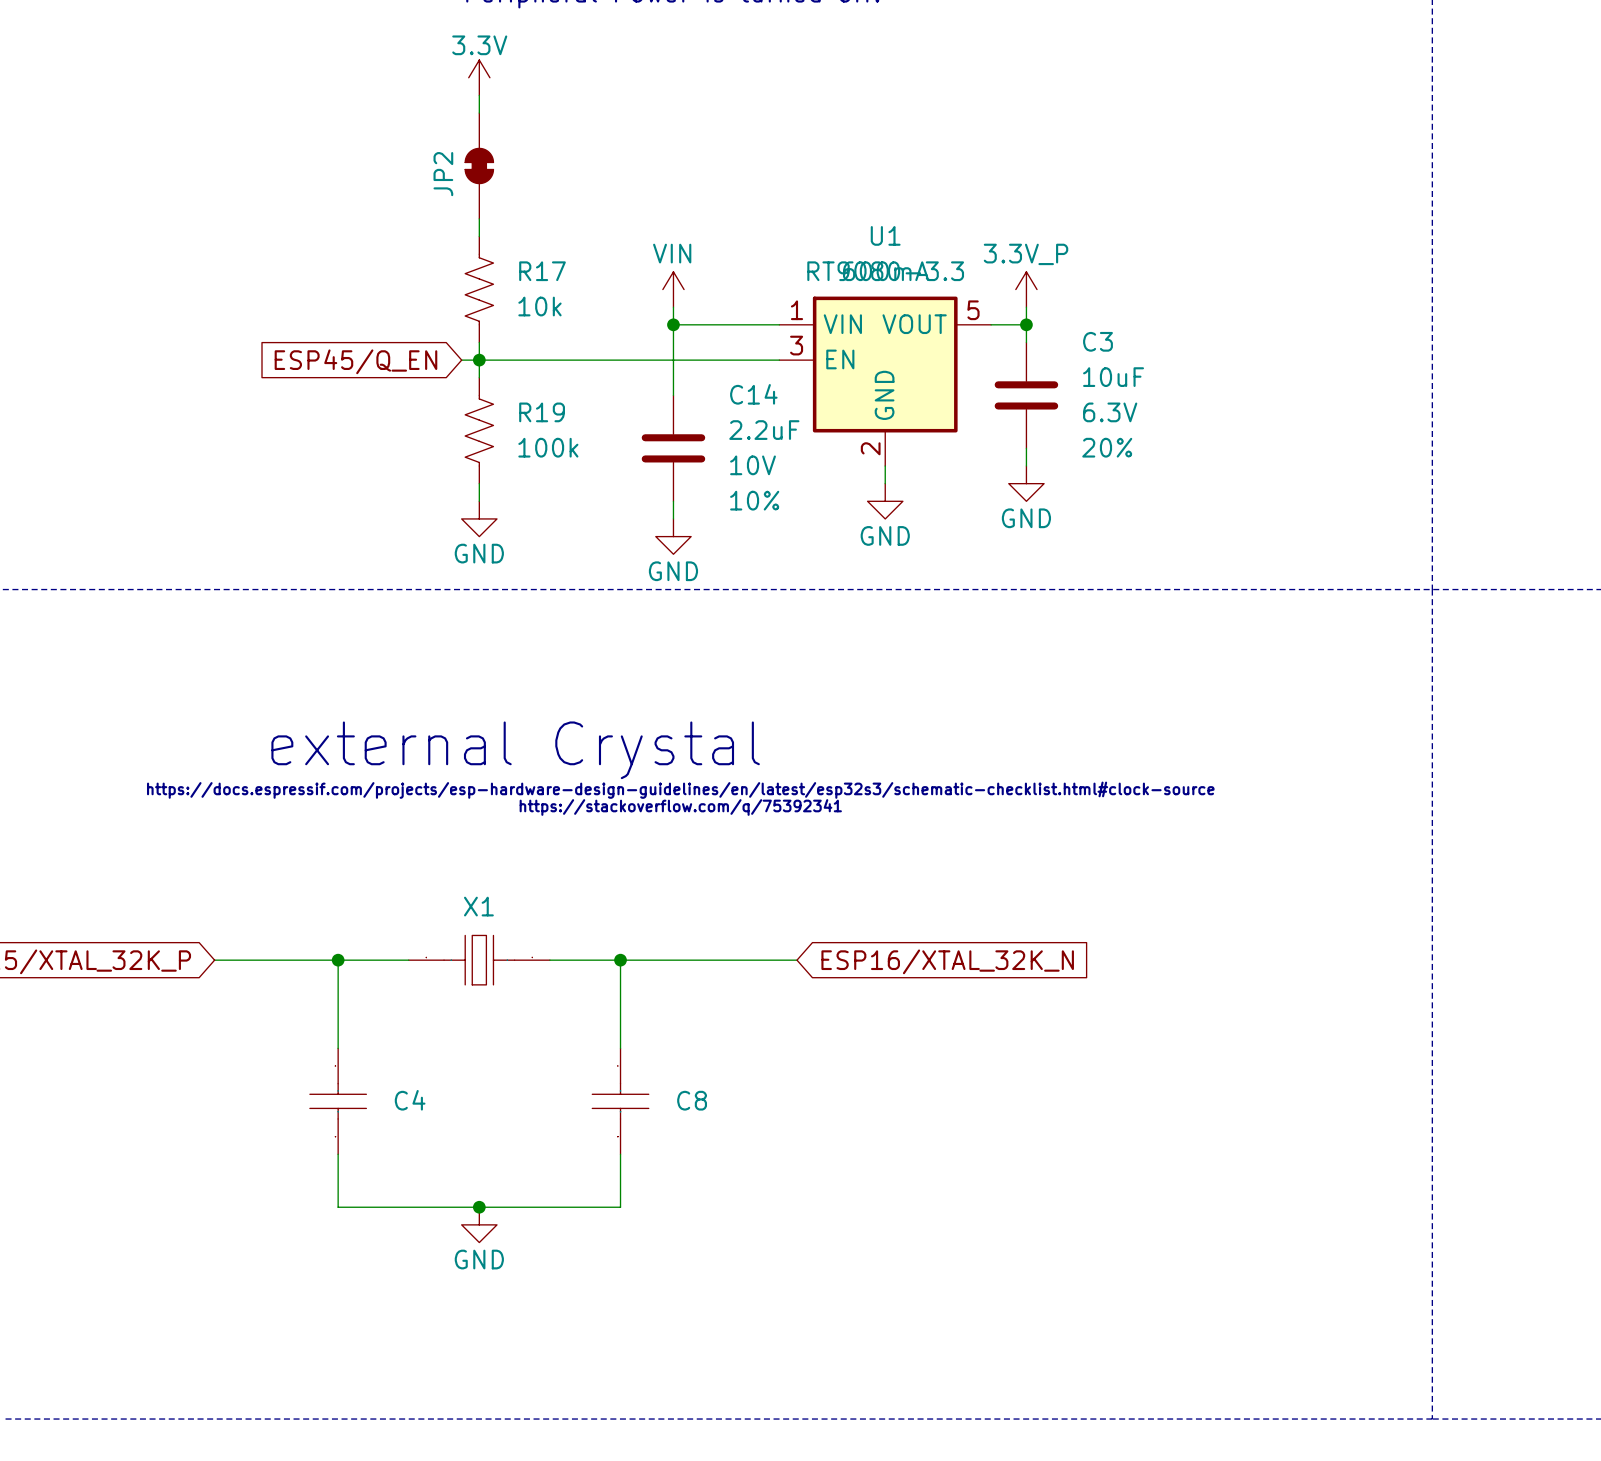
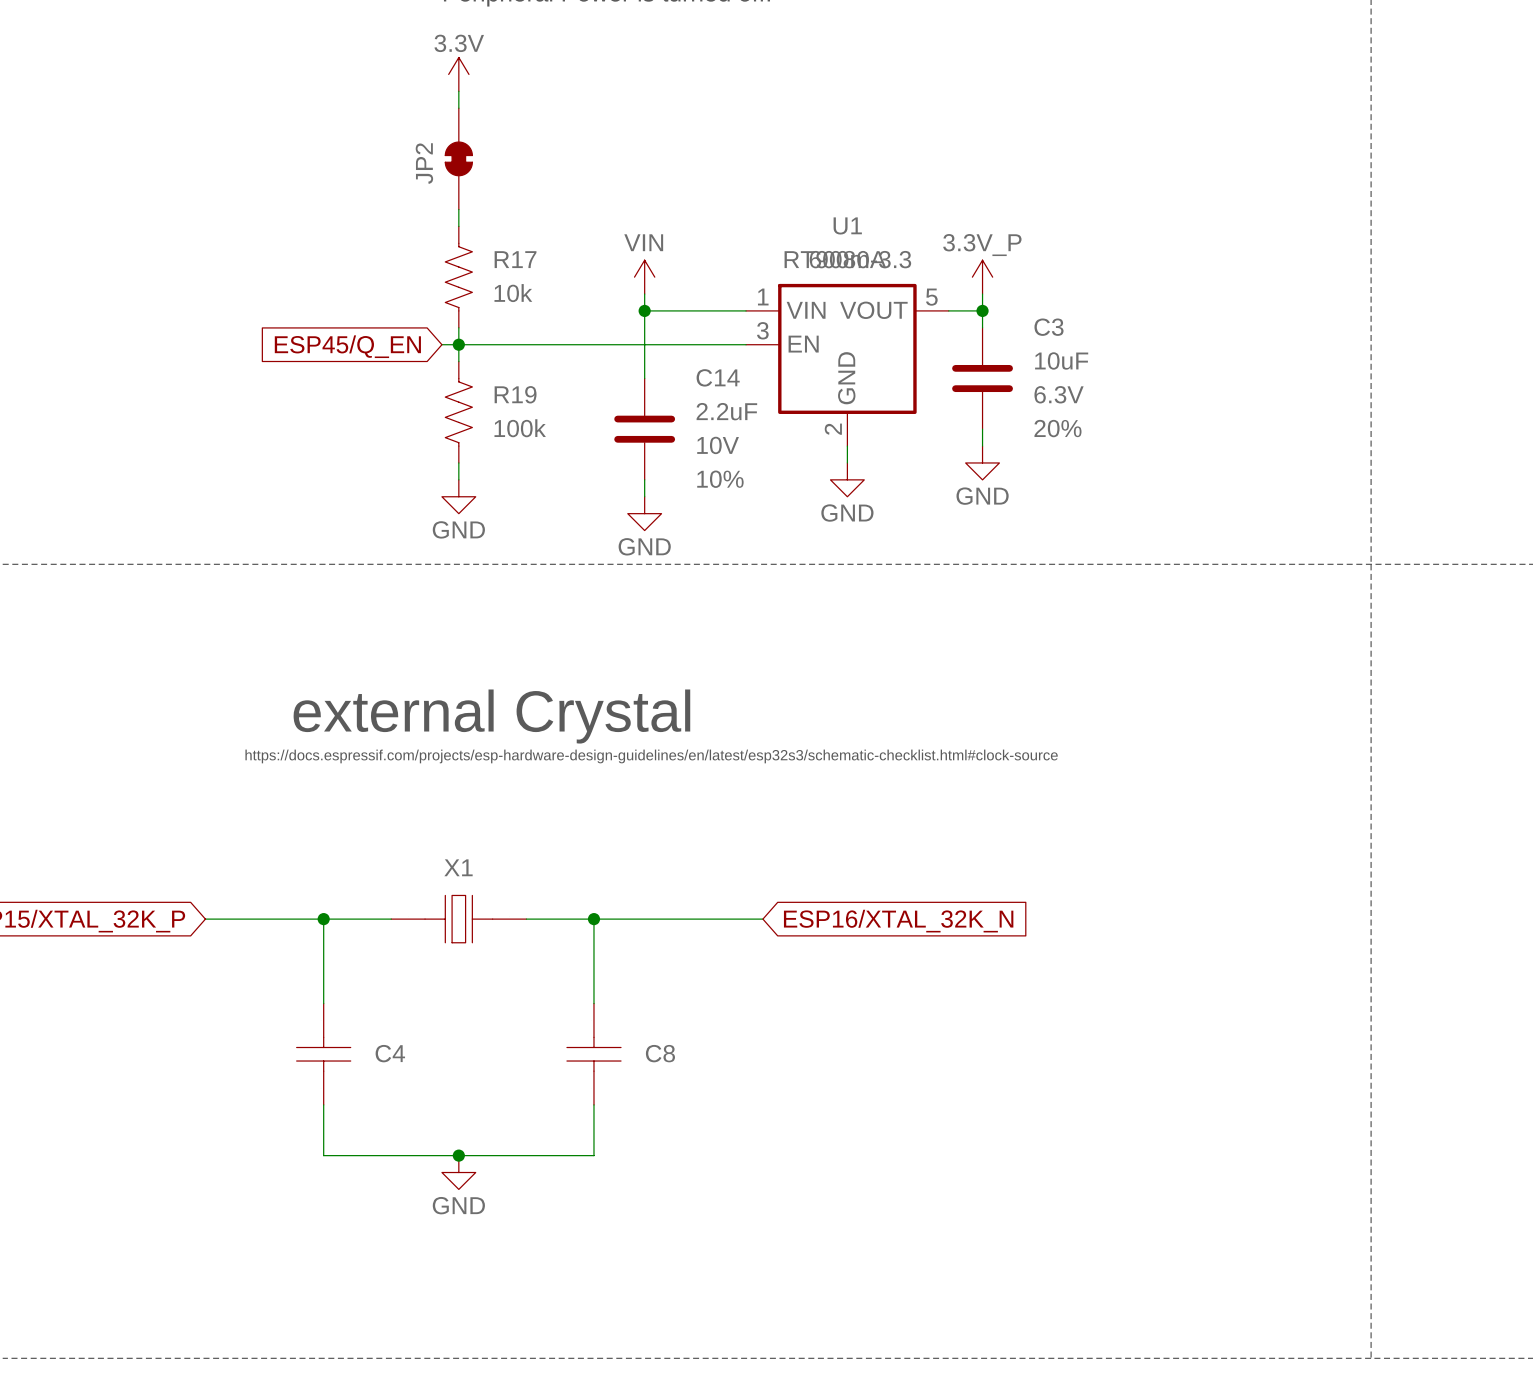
text: https://stackoverflow.com/q/75392341 (680, 807) -> none

